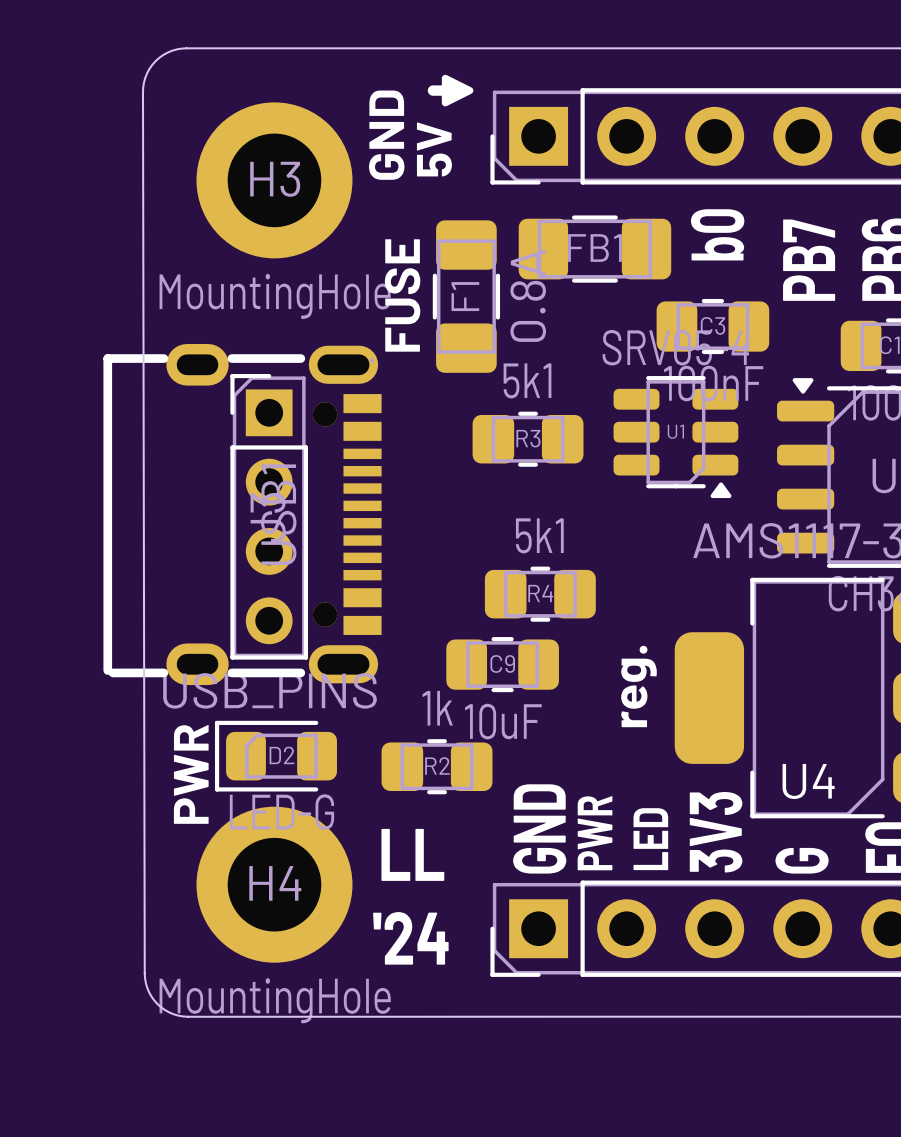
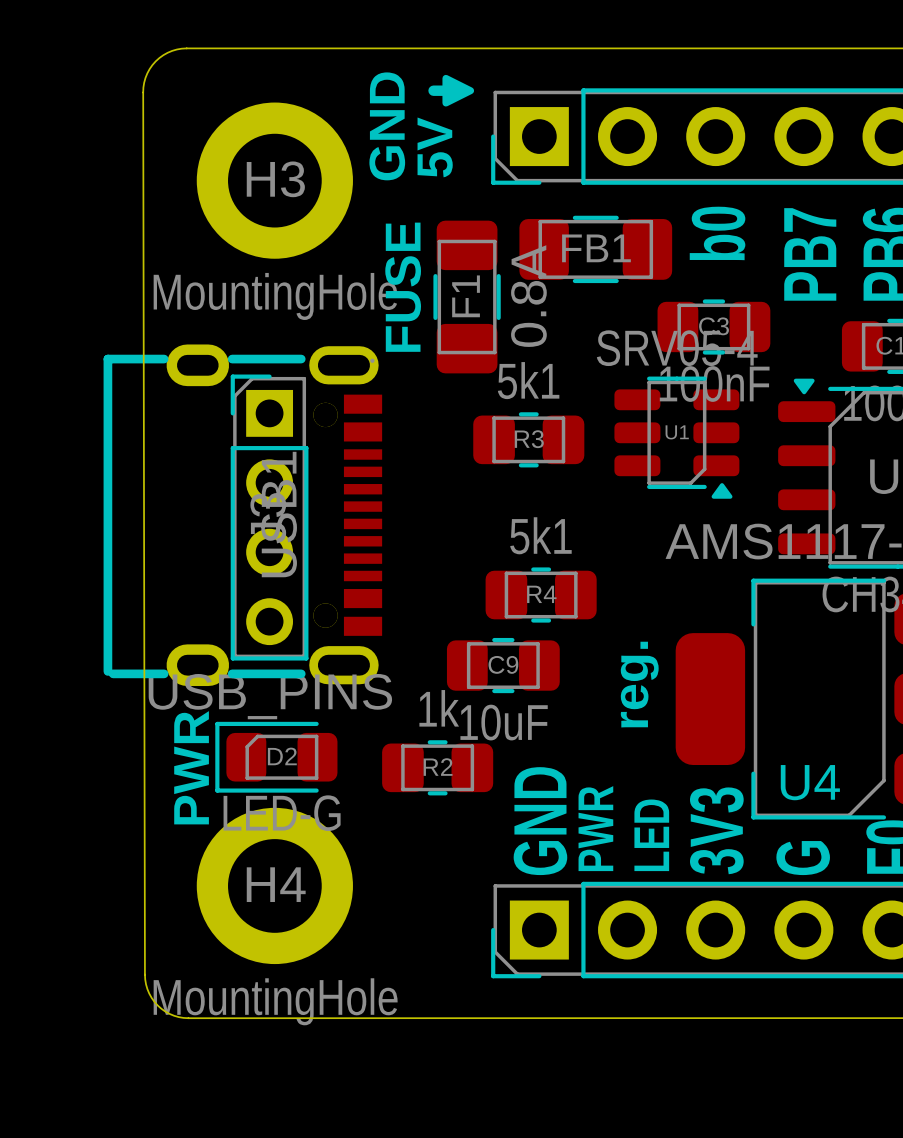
text: LL (412, 854) -> none
text: '24 (410, 938) -> none

